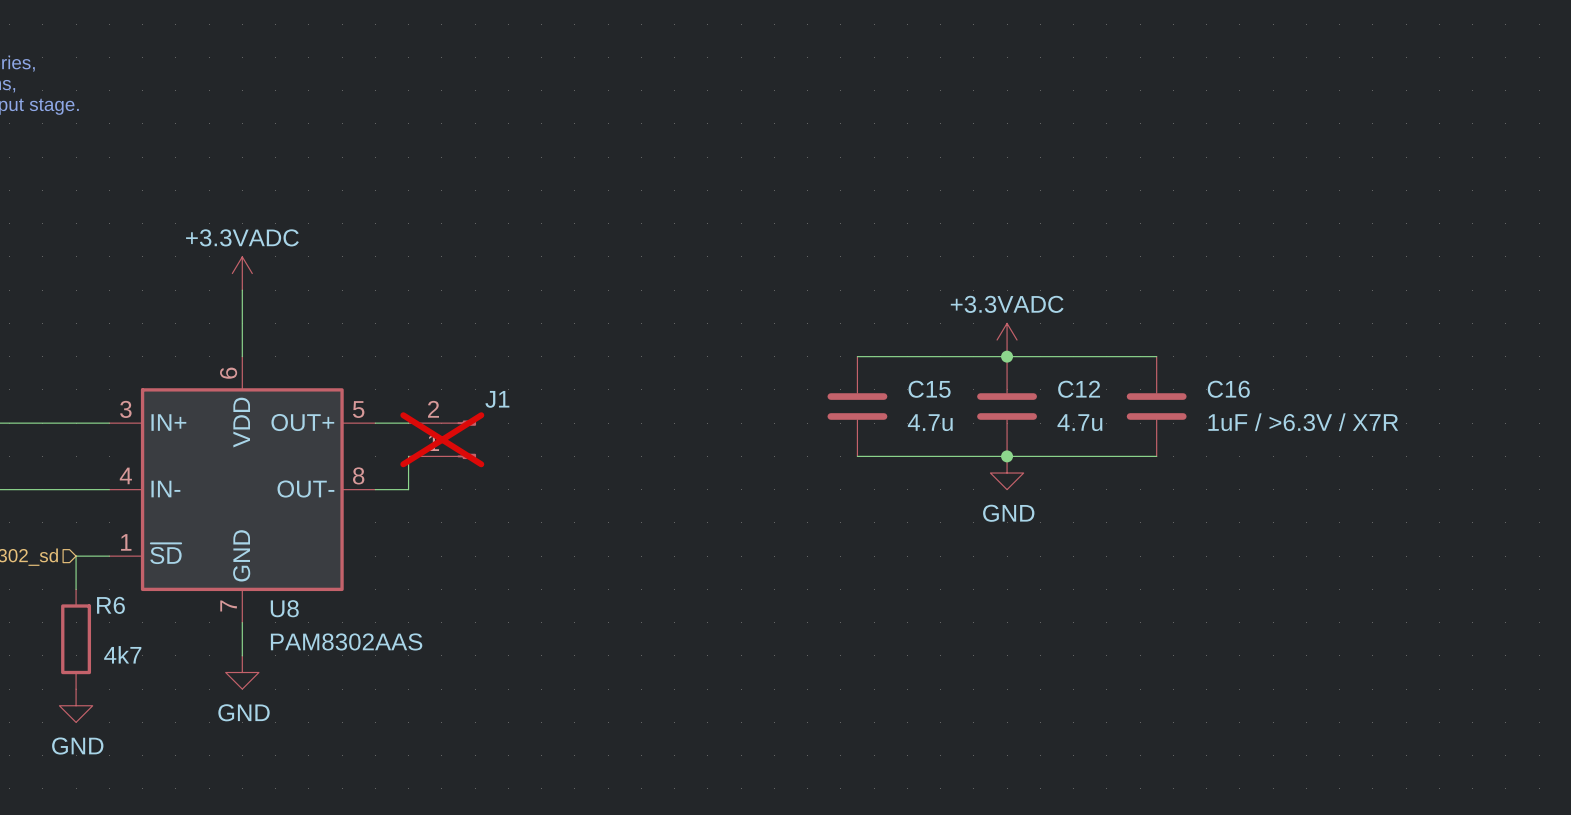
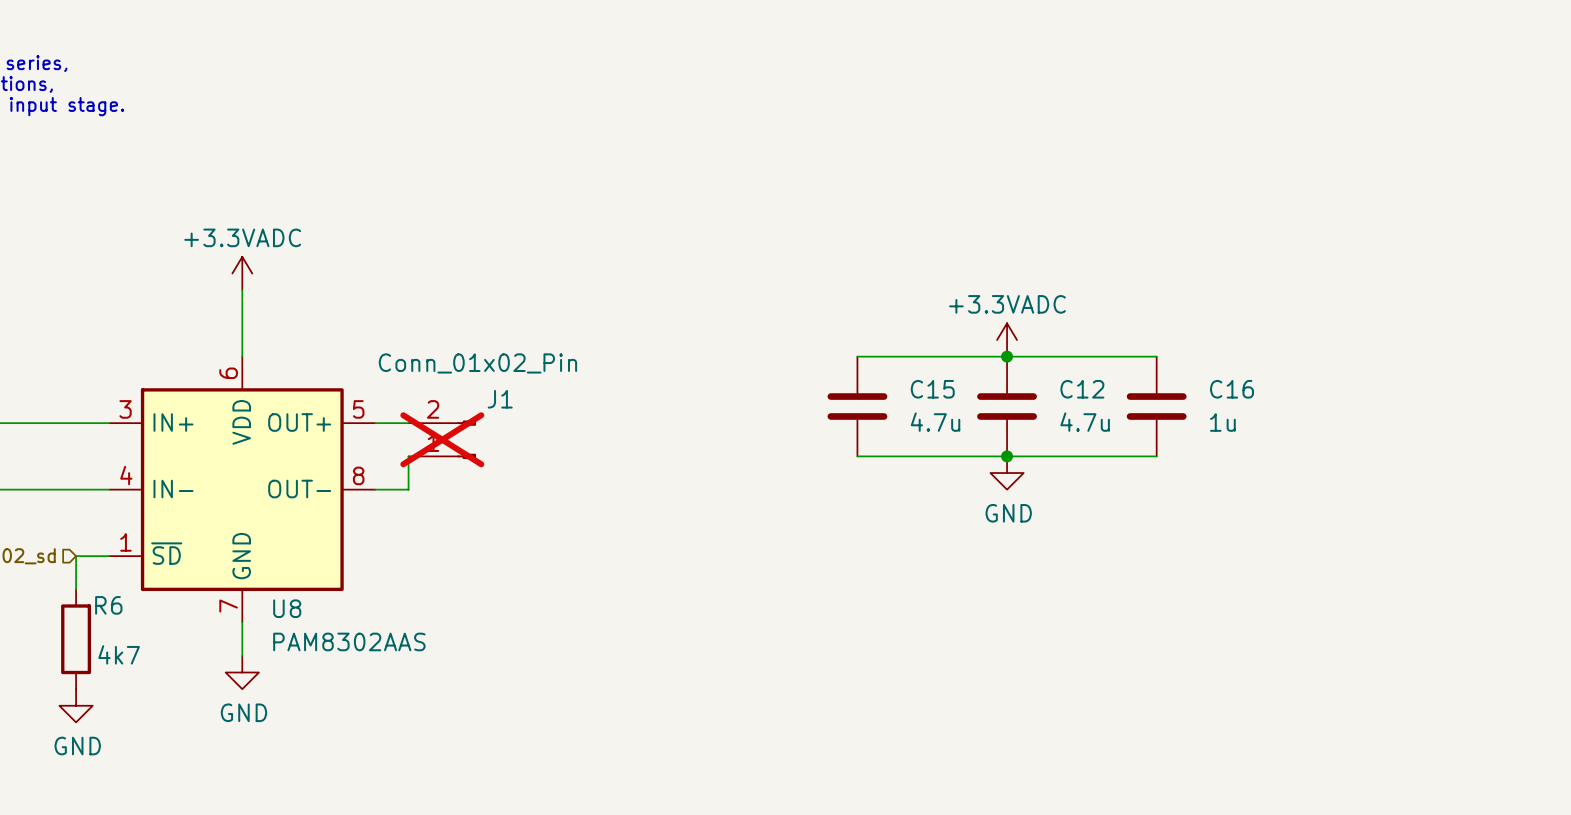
J1 value: none -> Conn_01x02_Pin (477, 363)
C16 value: 1uF / >6.3V / X7R (1303, 422) -> 1u (1222, 422)

